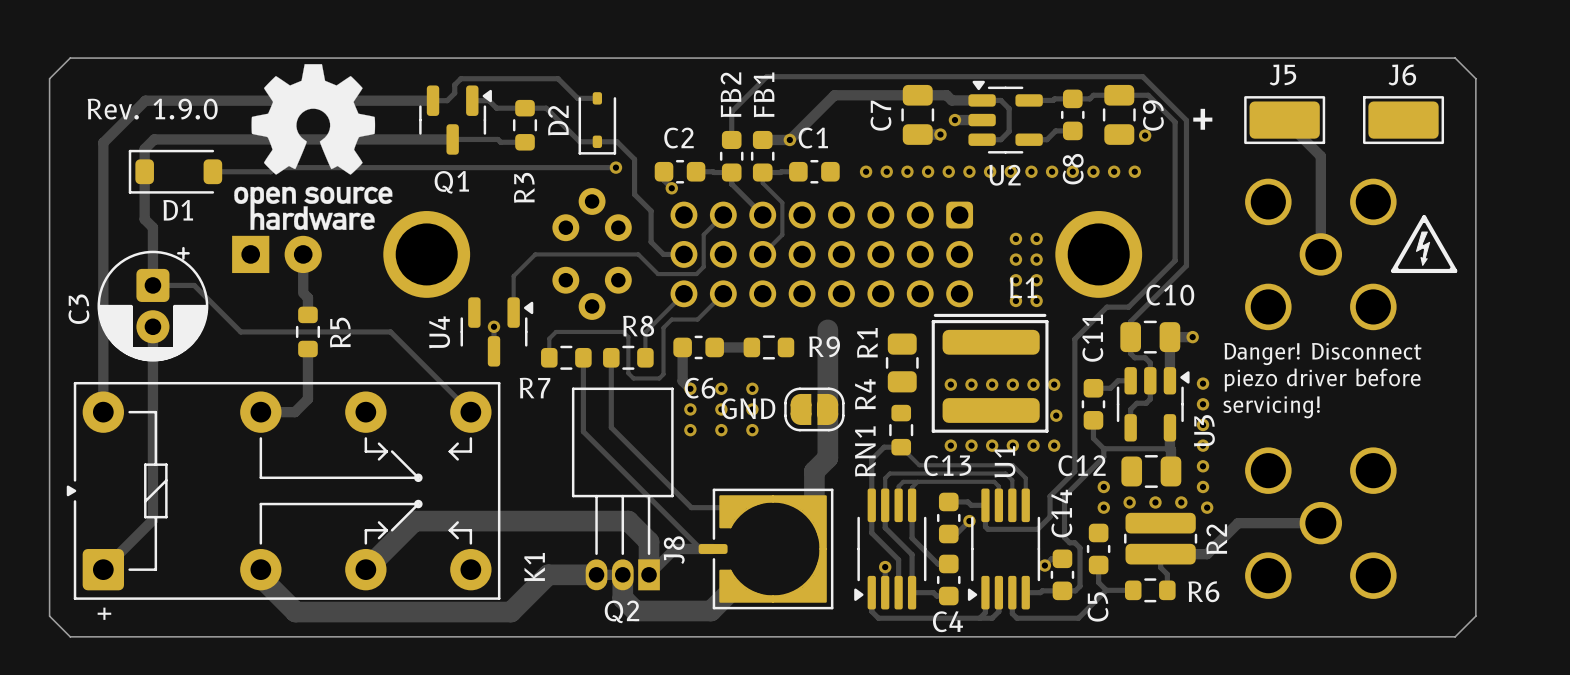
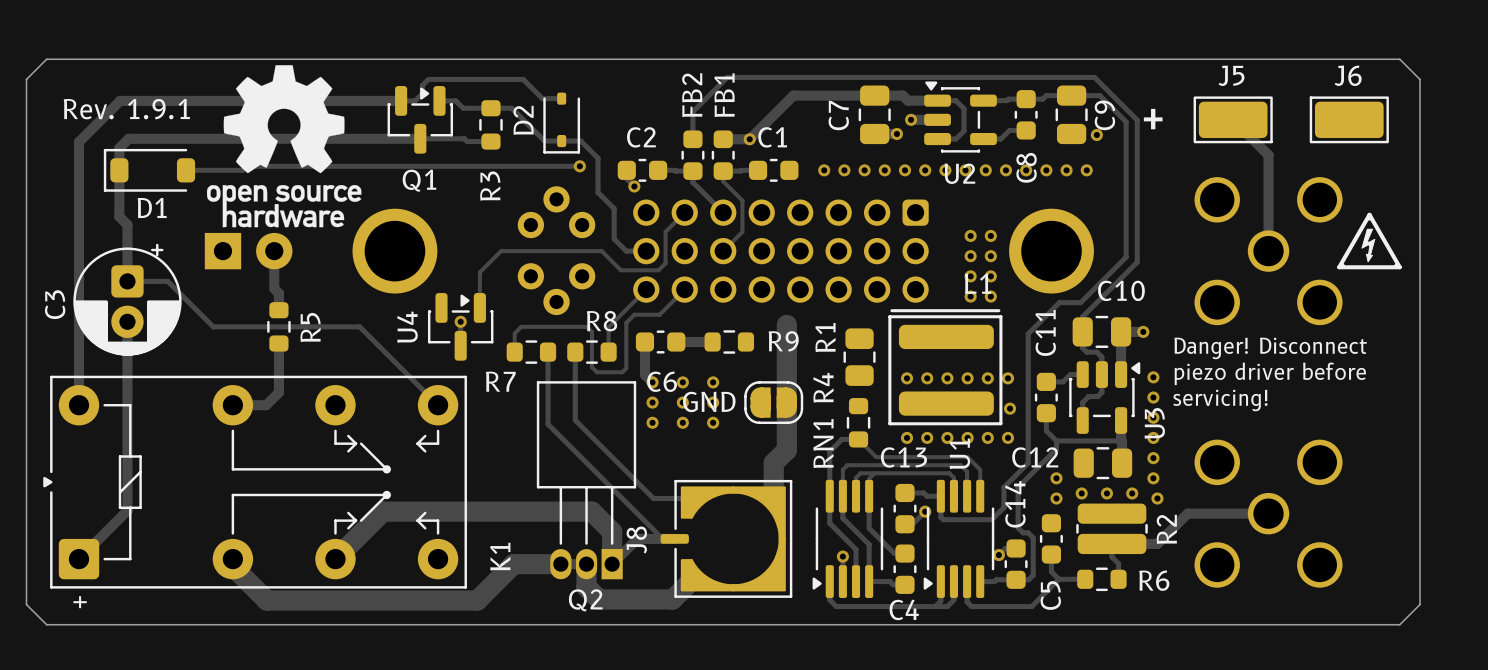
U2 footprint: [968, 80, 1043, 154] -> [924, 81, 997, 153]
Q1 footprint: [419, 85, 492, 155] -> [387, 86, 454, 154]
text: Rev. 1.9.0 (152, 109) -> Rev. 1.9.1 (126, 109)
U4 footprint: [460, 297, 534, 367] -> [427, 293, 494, 361]
U3 footprint: [1116, 367, 1190, 442] -> [1069, 361, 1141, 434]

